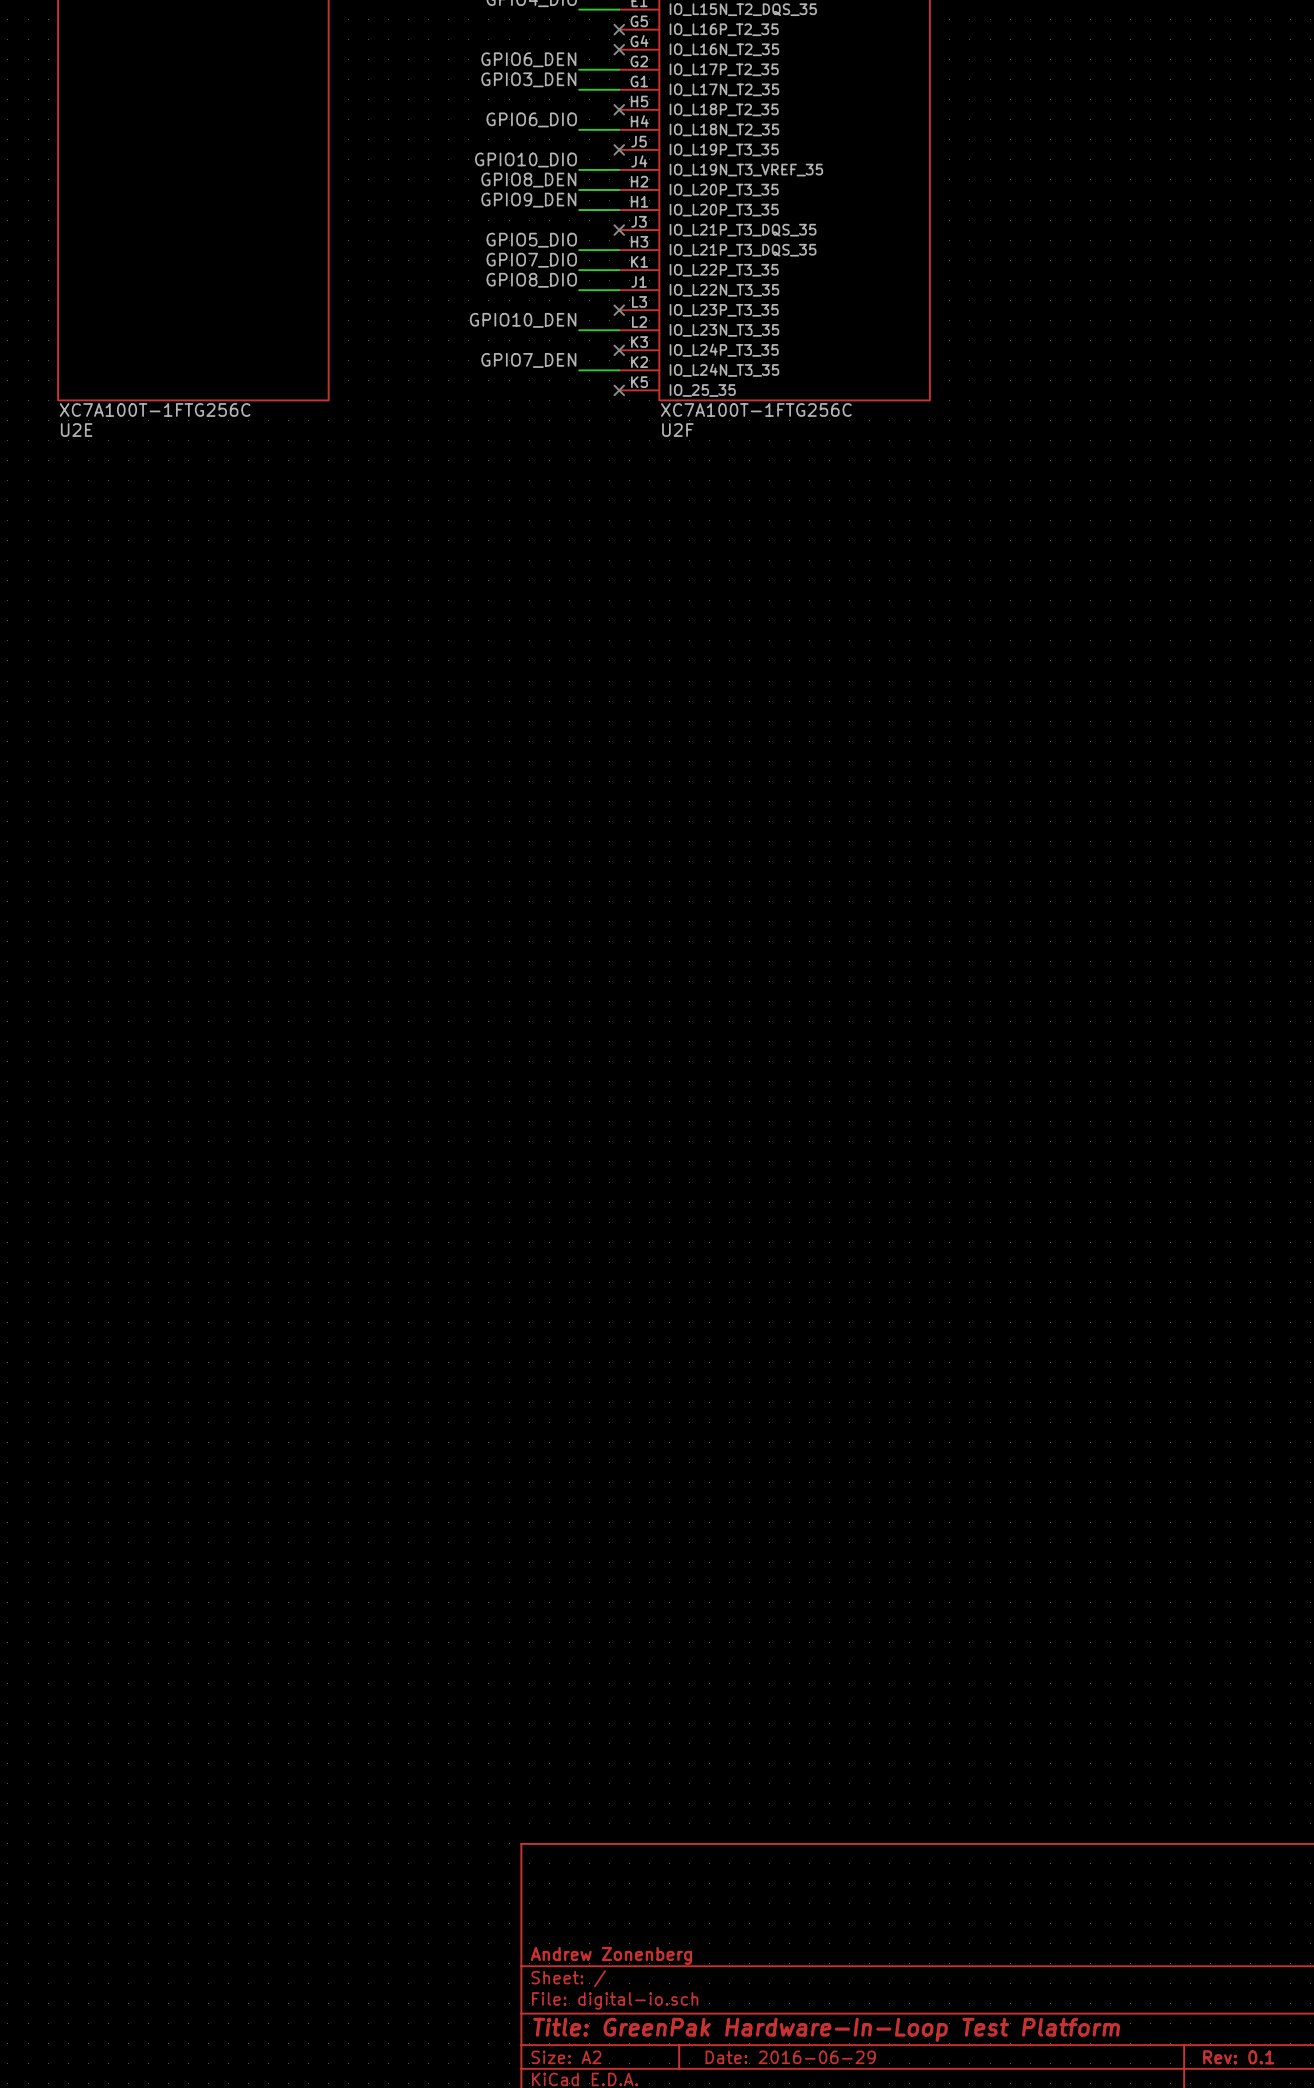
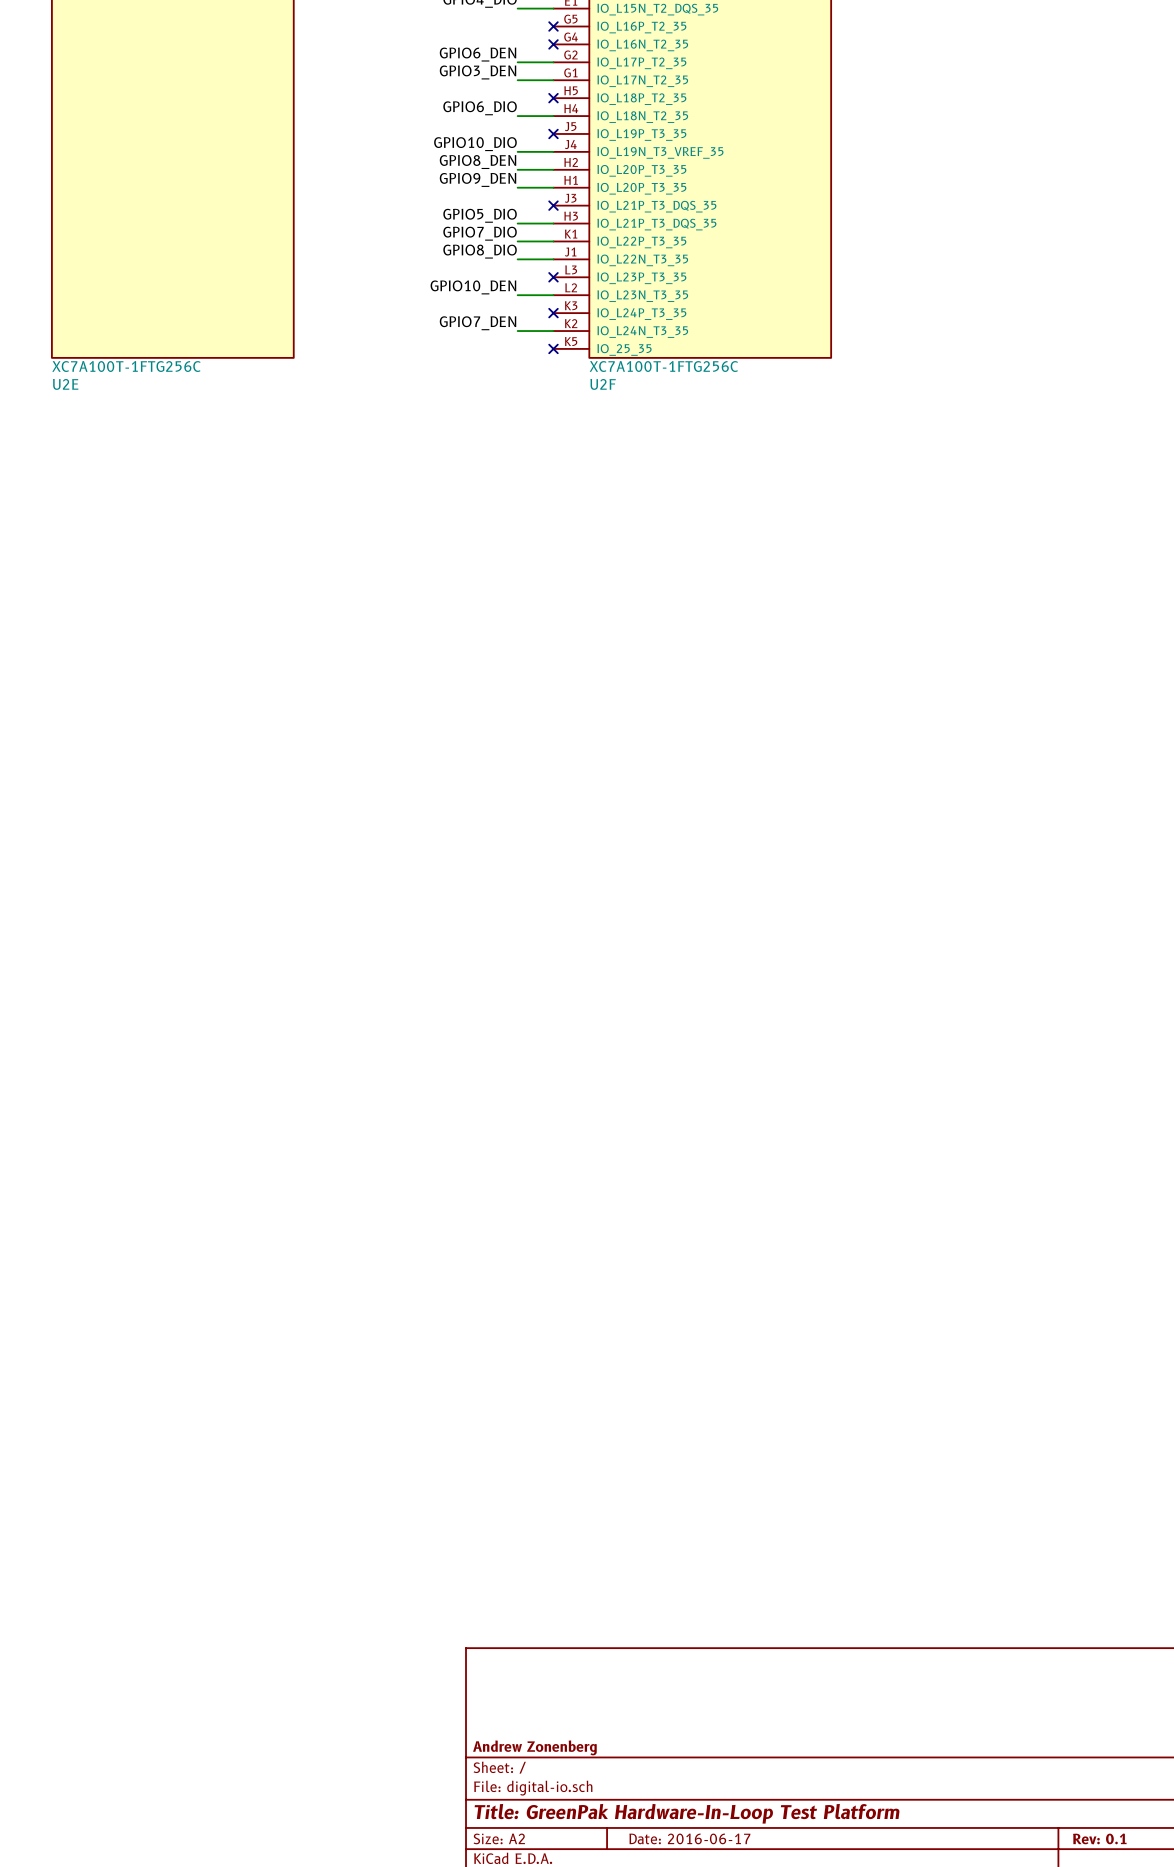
title block: Date: 2016-06-29 (790, 2057) -> Date: 2016-06-17 (689, 1838)

